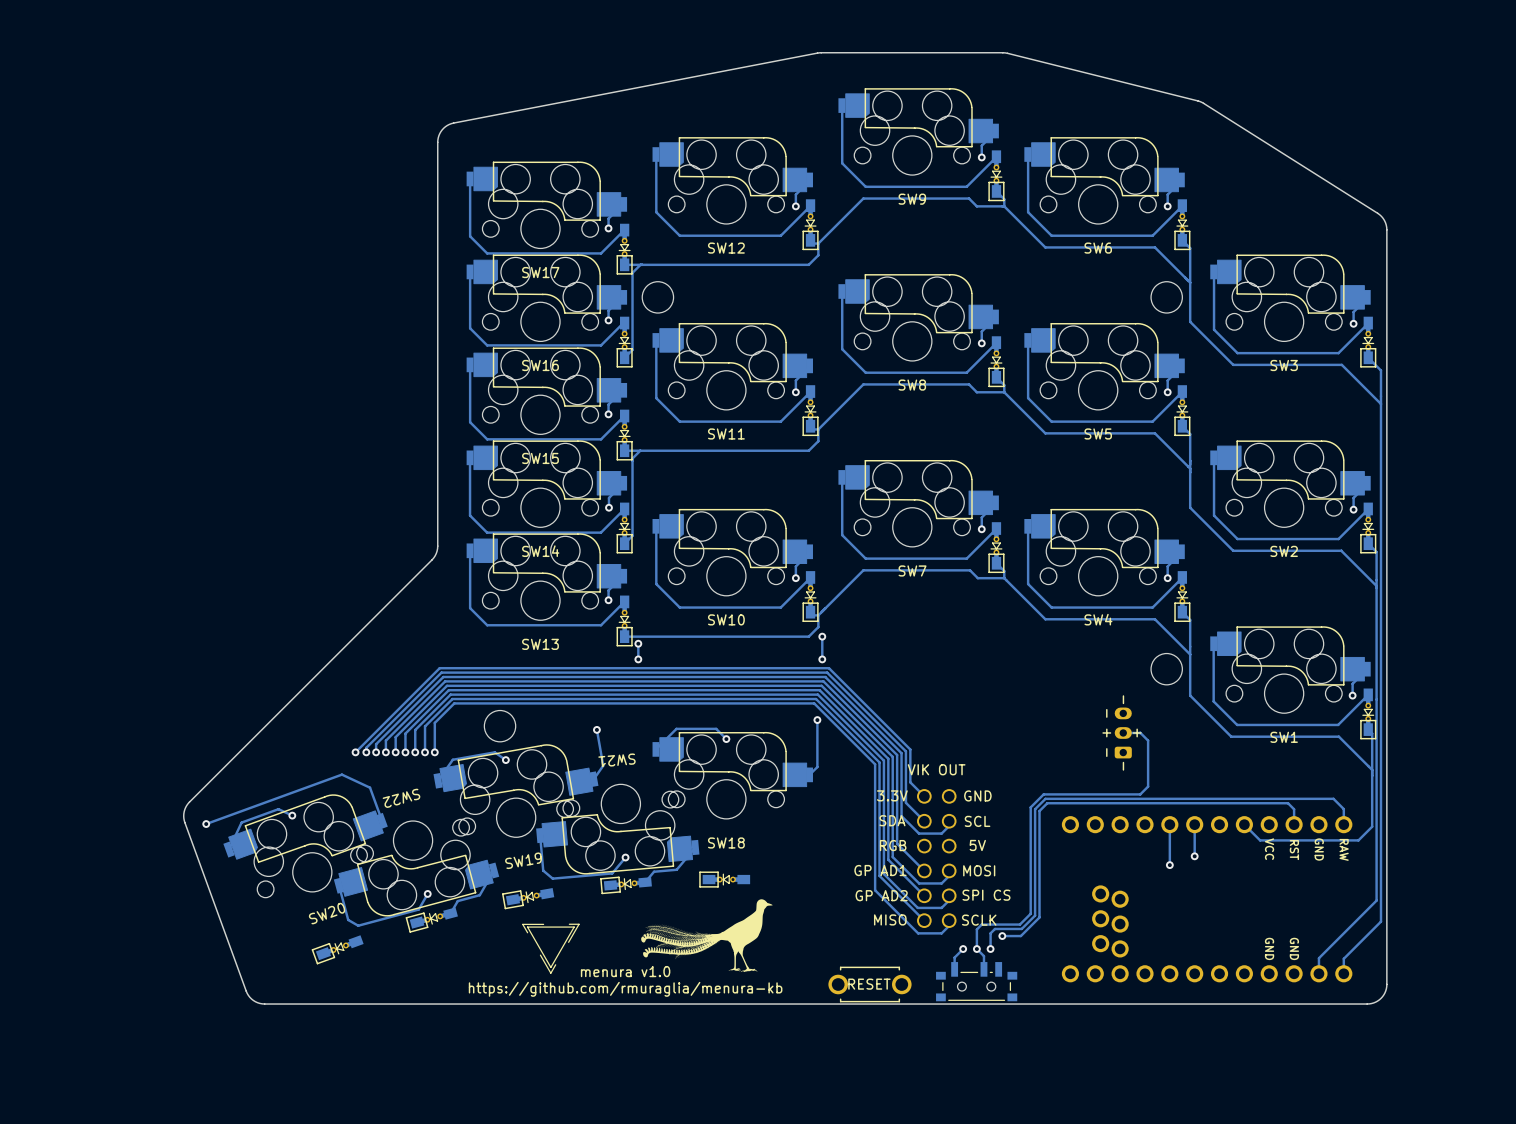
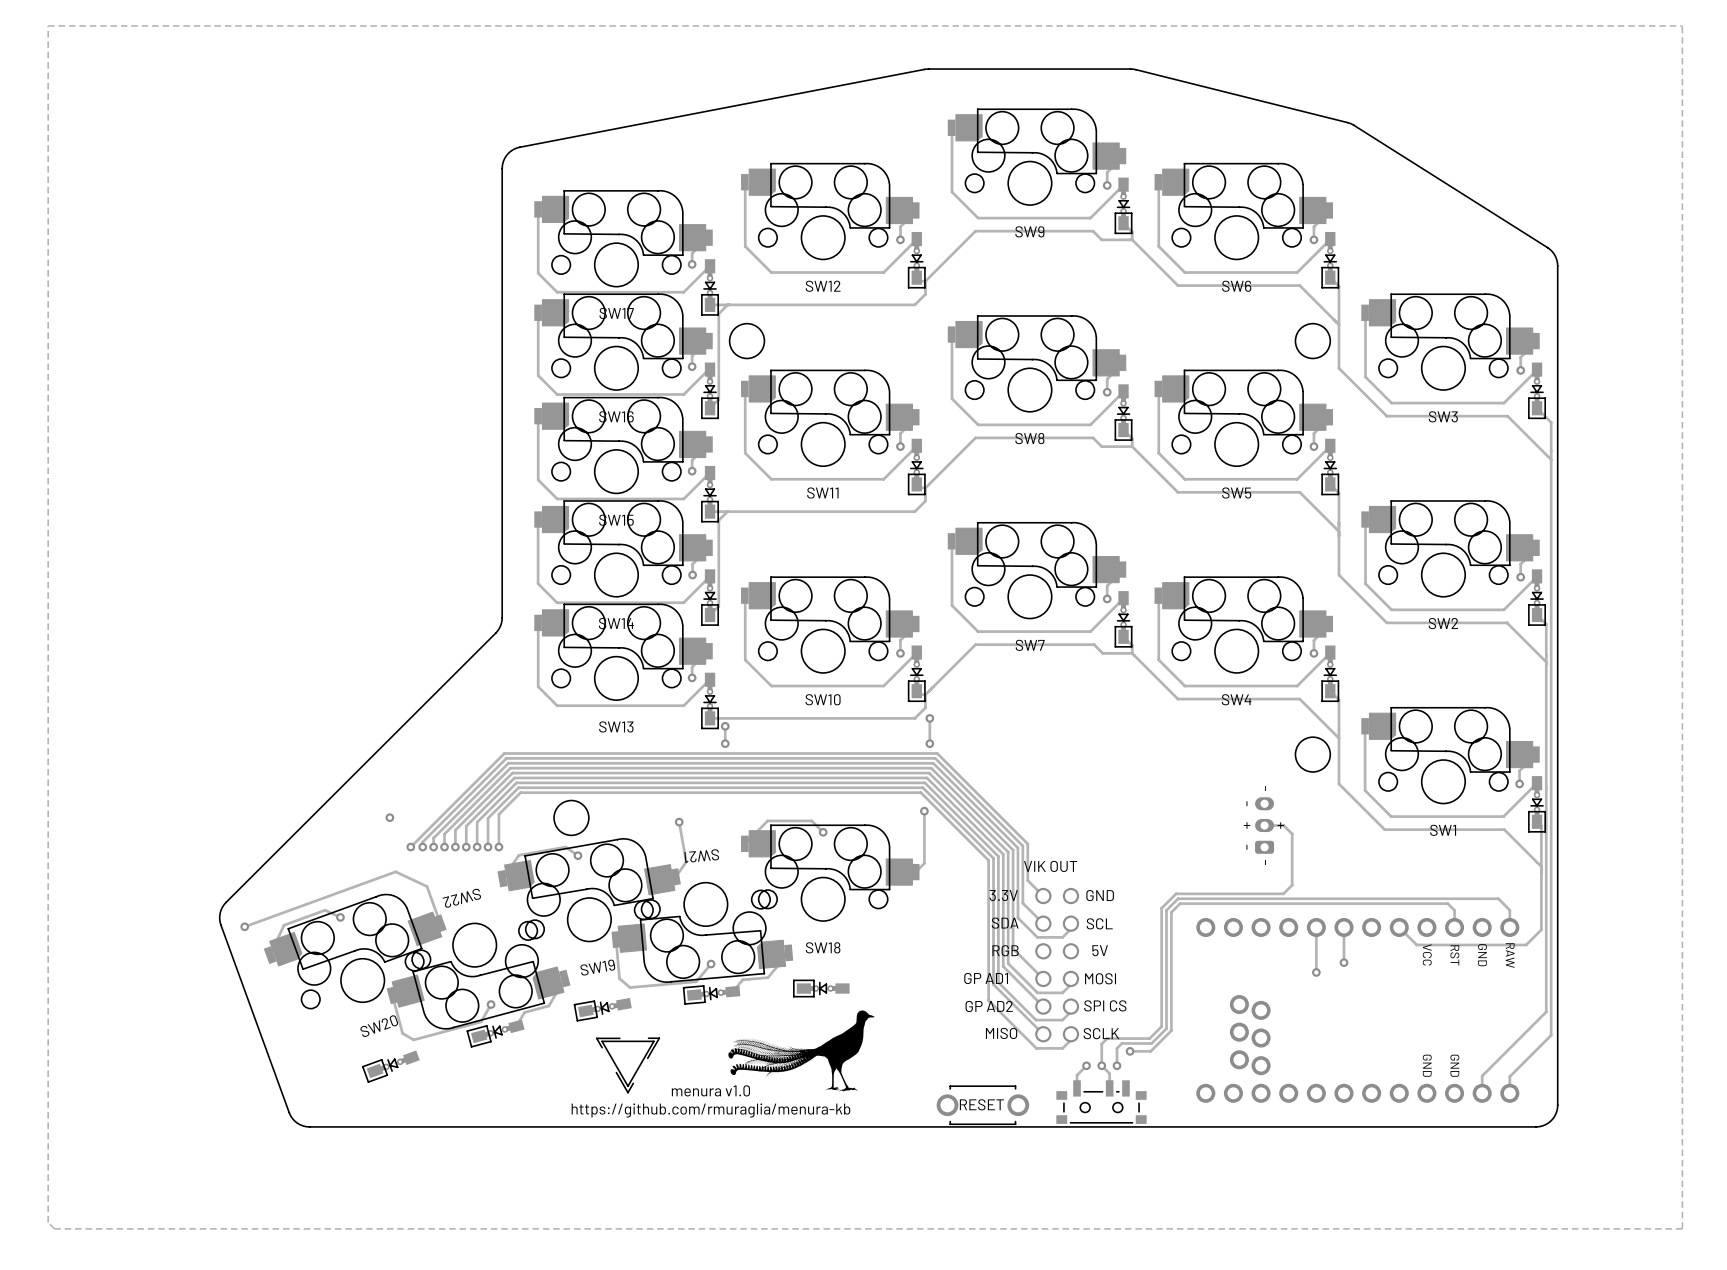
zone outline: none -> (1681, 25) (48, 25) (48, 1222) (54, 1228) (1682, 1228) (1681, 25)
via: none -> (389, 817)

